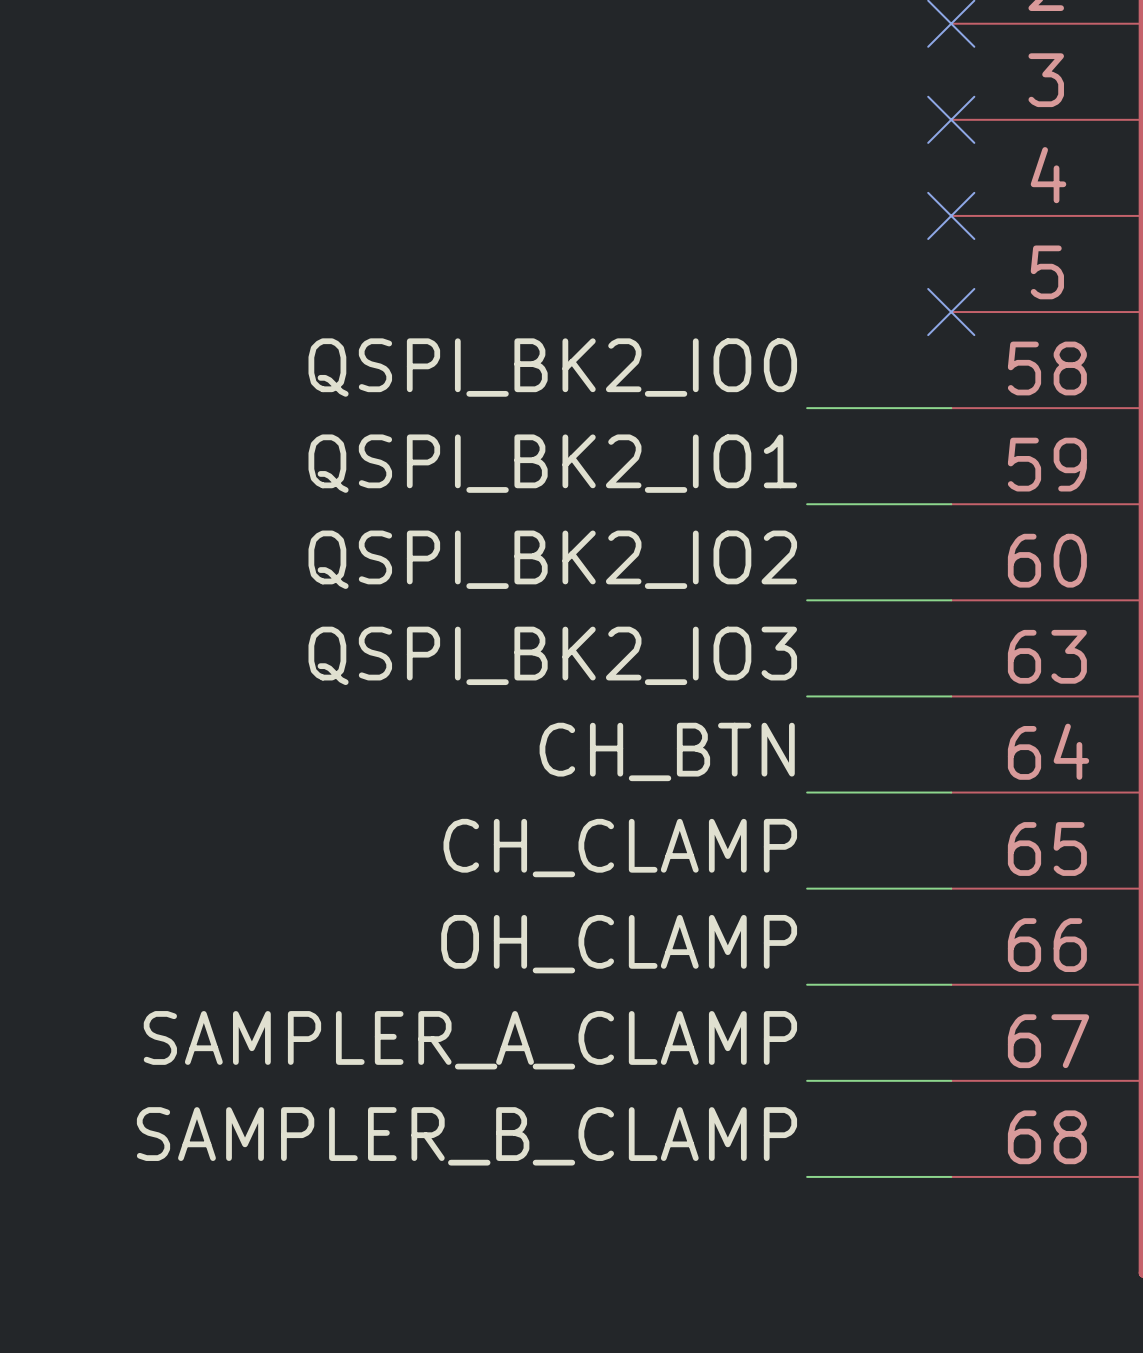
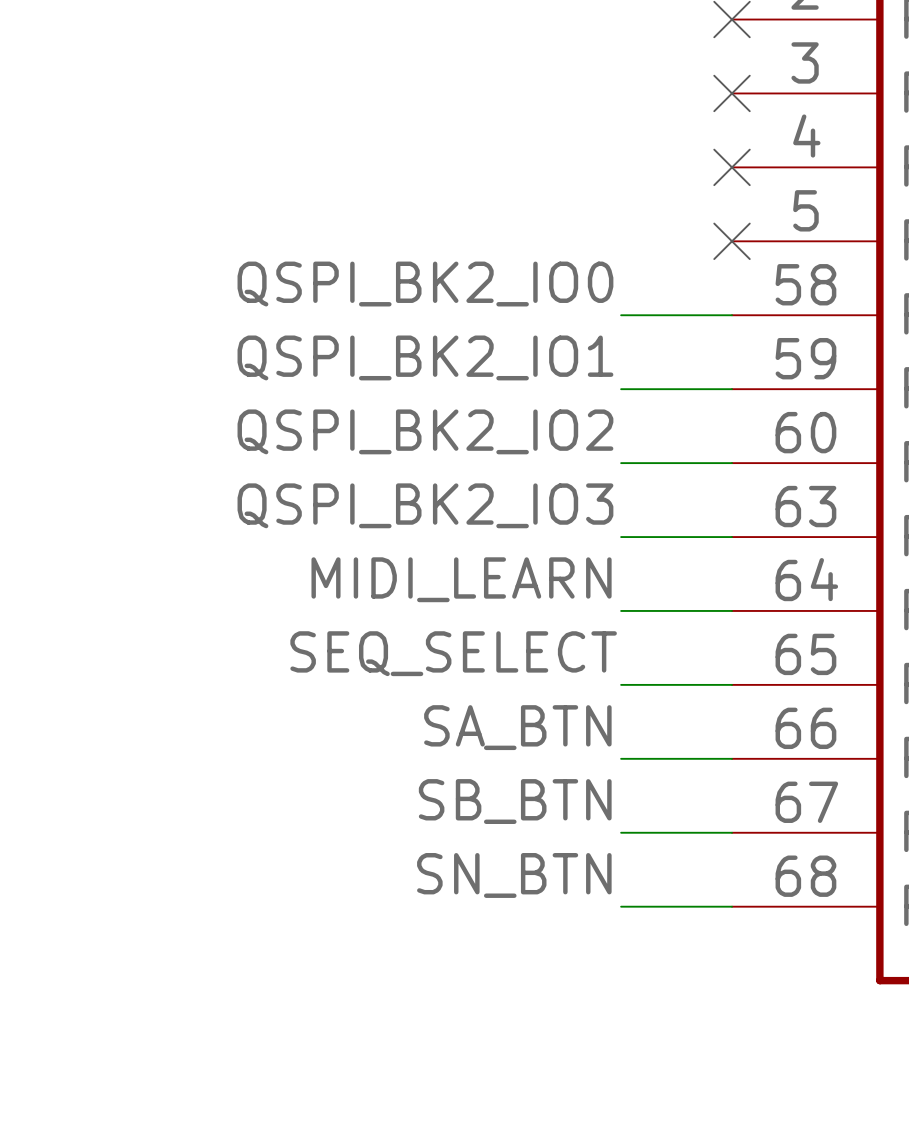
label: CH_BTN (667, 751) -> MIDI_LEARN (461, 579)
label: CH_CLAMP (620, 848) -> SEQ_SELECT (453, 653)
label: OH_CLAMP (619, 944) -> SA_BTN (517, 727)
label: SAMPLER_A_CLAMP (470, 1040) -> SB_BTN (515, 801)
label: SAMPLER_B_CLAMP (466, 1136) -> SN_BTN (514, 875)

